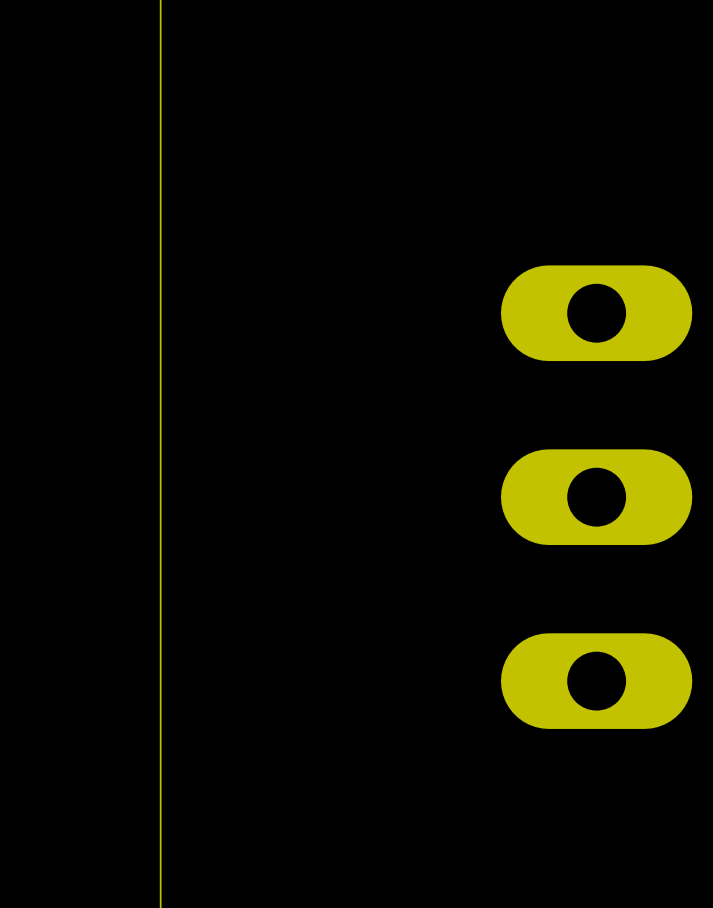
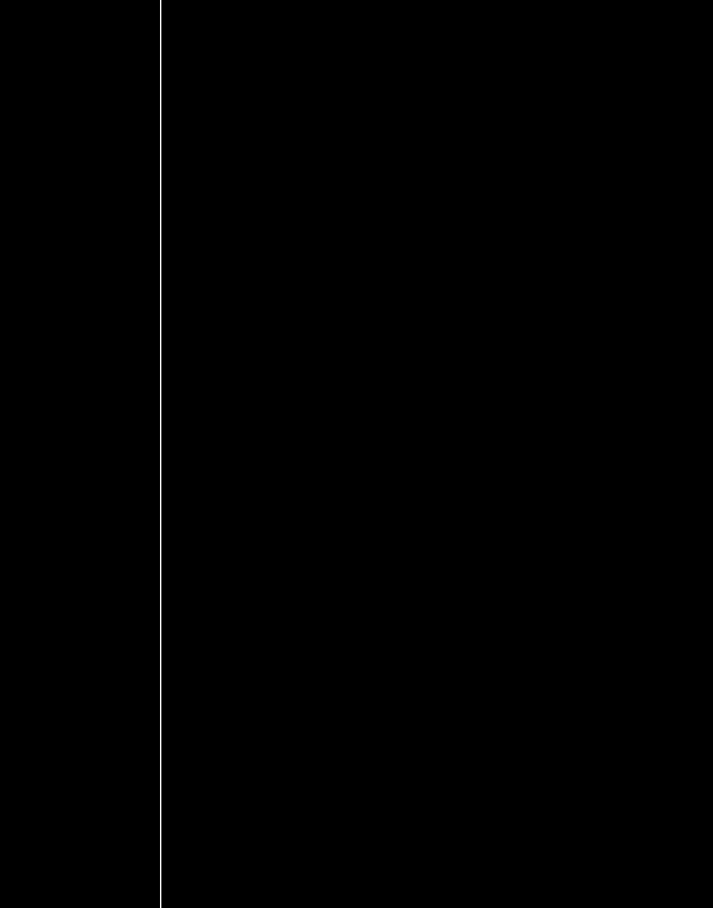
part: (596, 497) -> none

